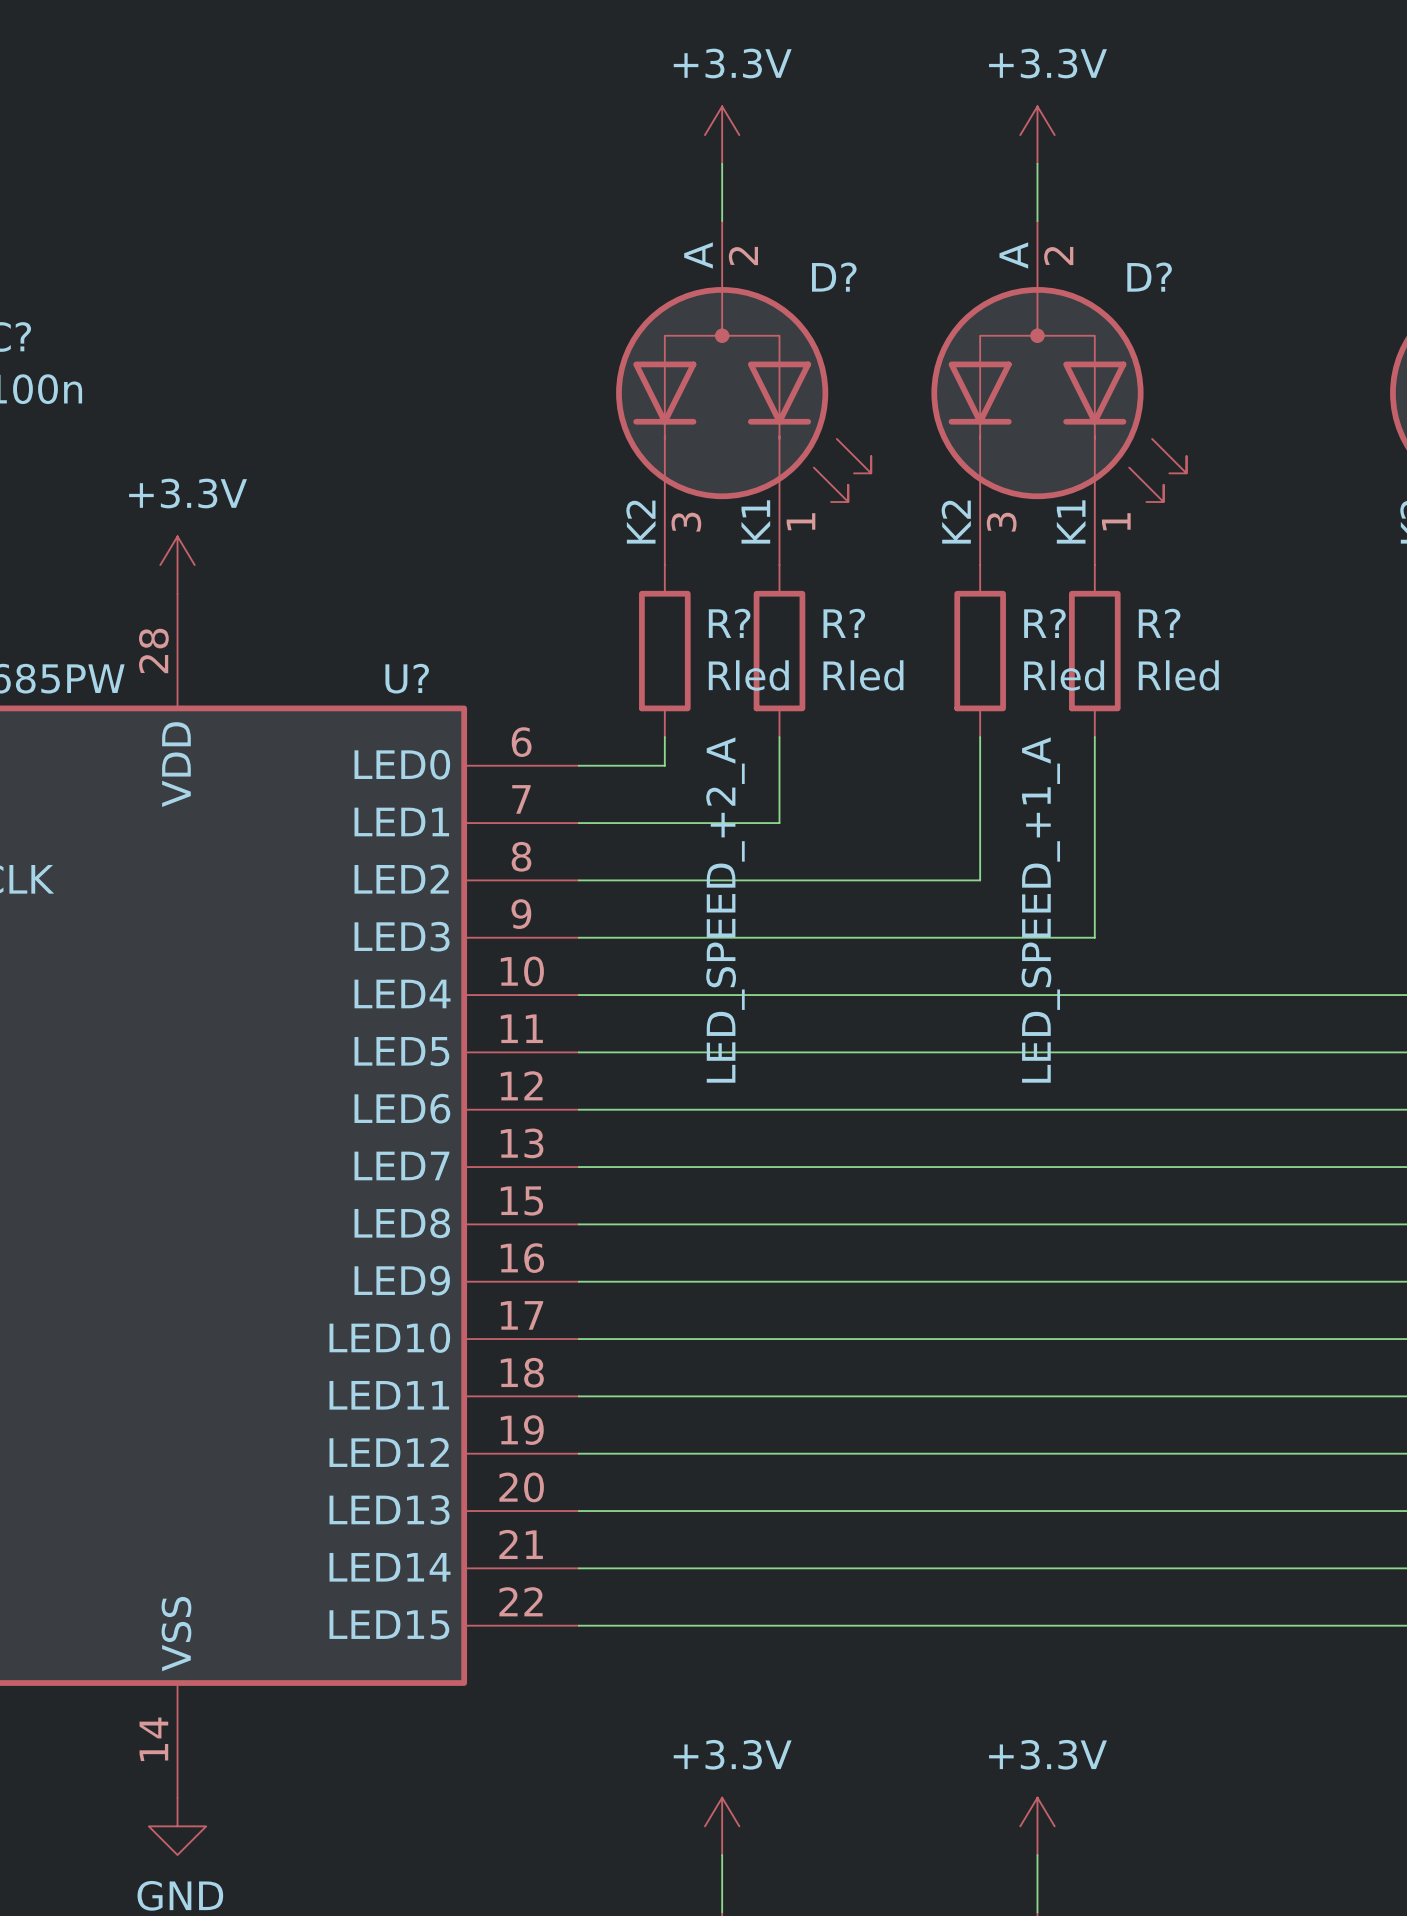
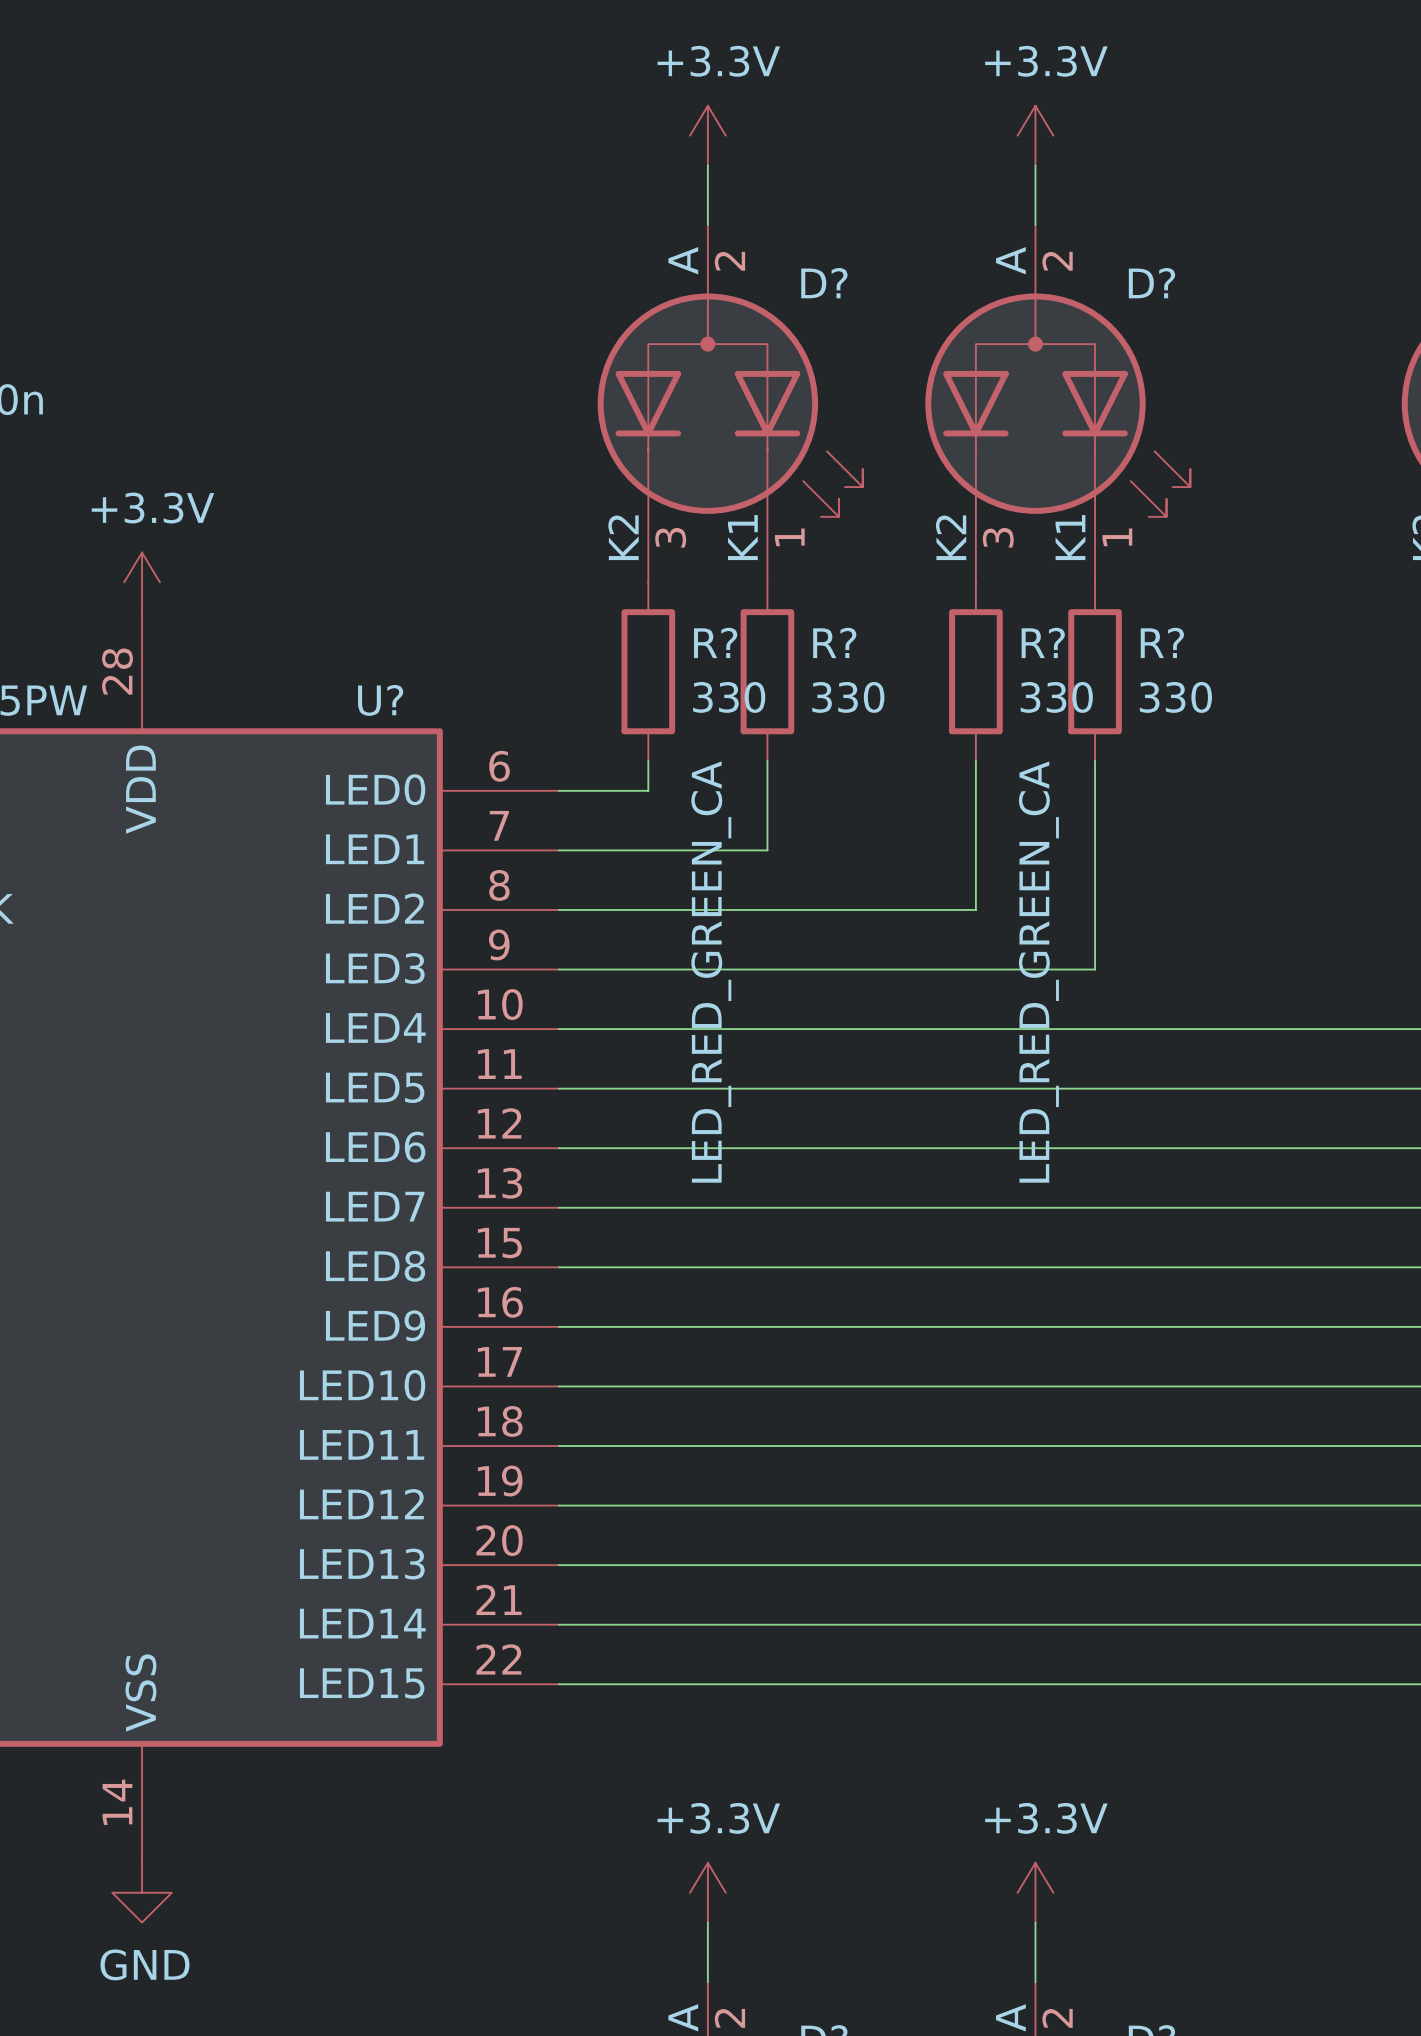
R? value: Rled (748, 675) -> 330 (729, 697)
R? value: Rled (863, 675) -> 330 (848, 697)
R? value: Rled (1064, 675) -> 330 (1056, 697)
R? value: Rled (1178, 675) -> 330 (1175, 697)
D? value: LED_SPEED_+2_A (725, 910) -> LED_RED_GREEN_CA (711, 972)
D? value: LED_SPEED_+1_A (1040, 910) -> LED_RED_GREEN_CA (1038, 972)

